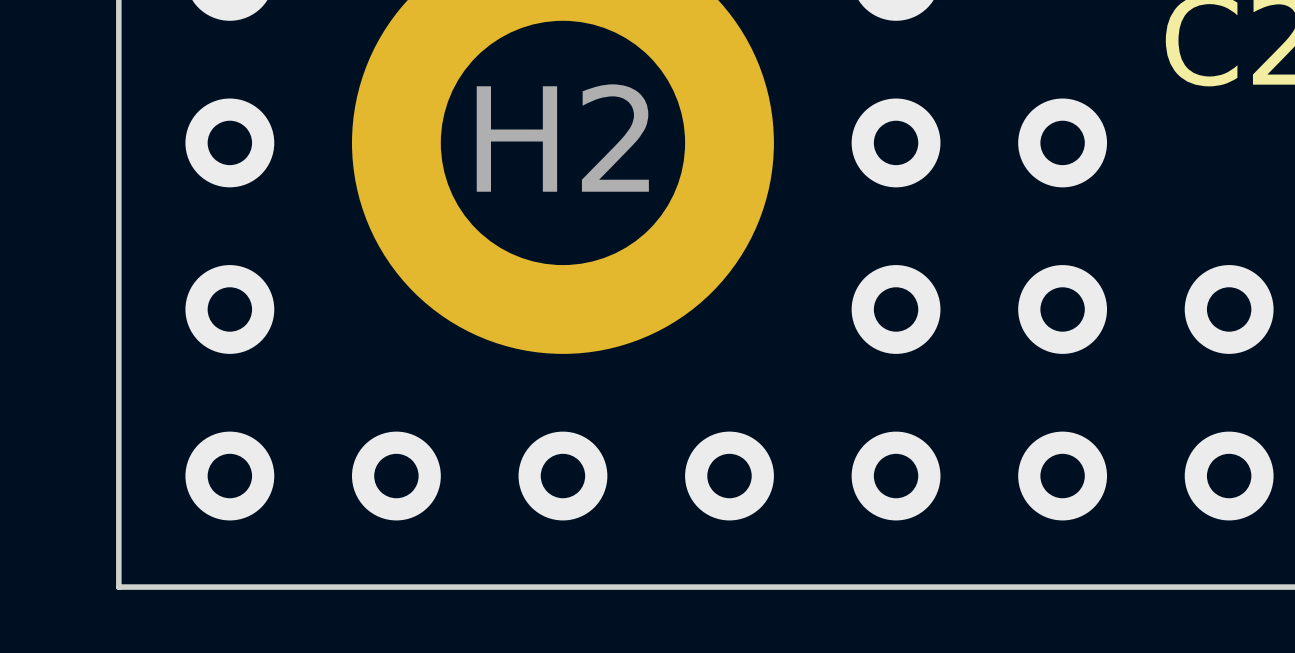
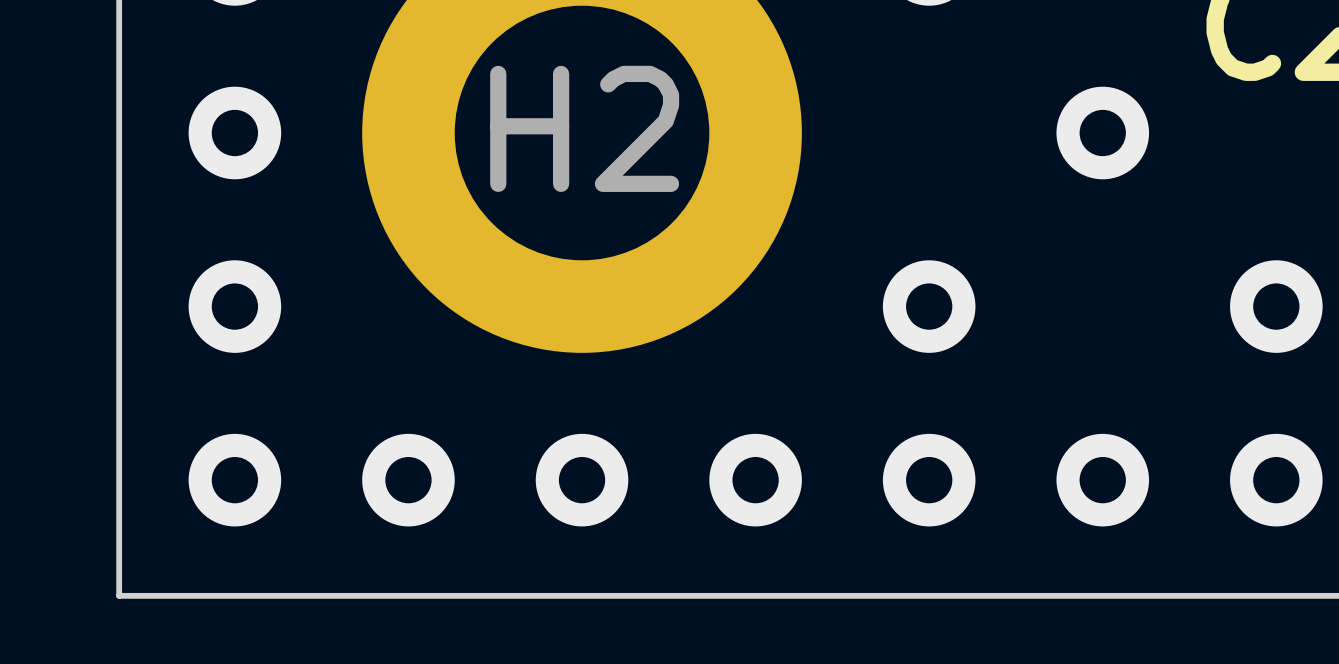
via: (896, 142) -> none
via: (1062, 309) -> none

